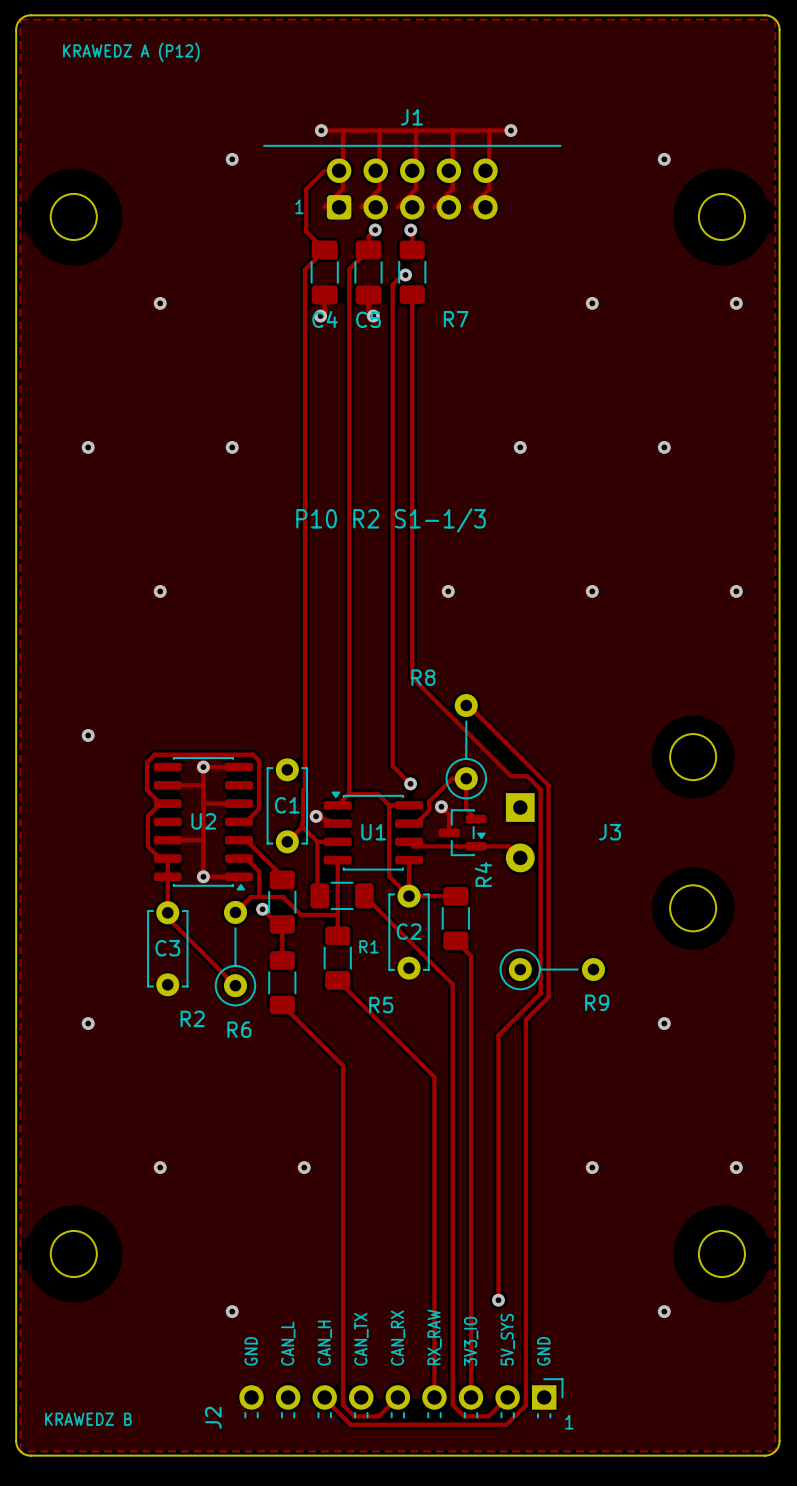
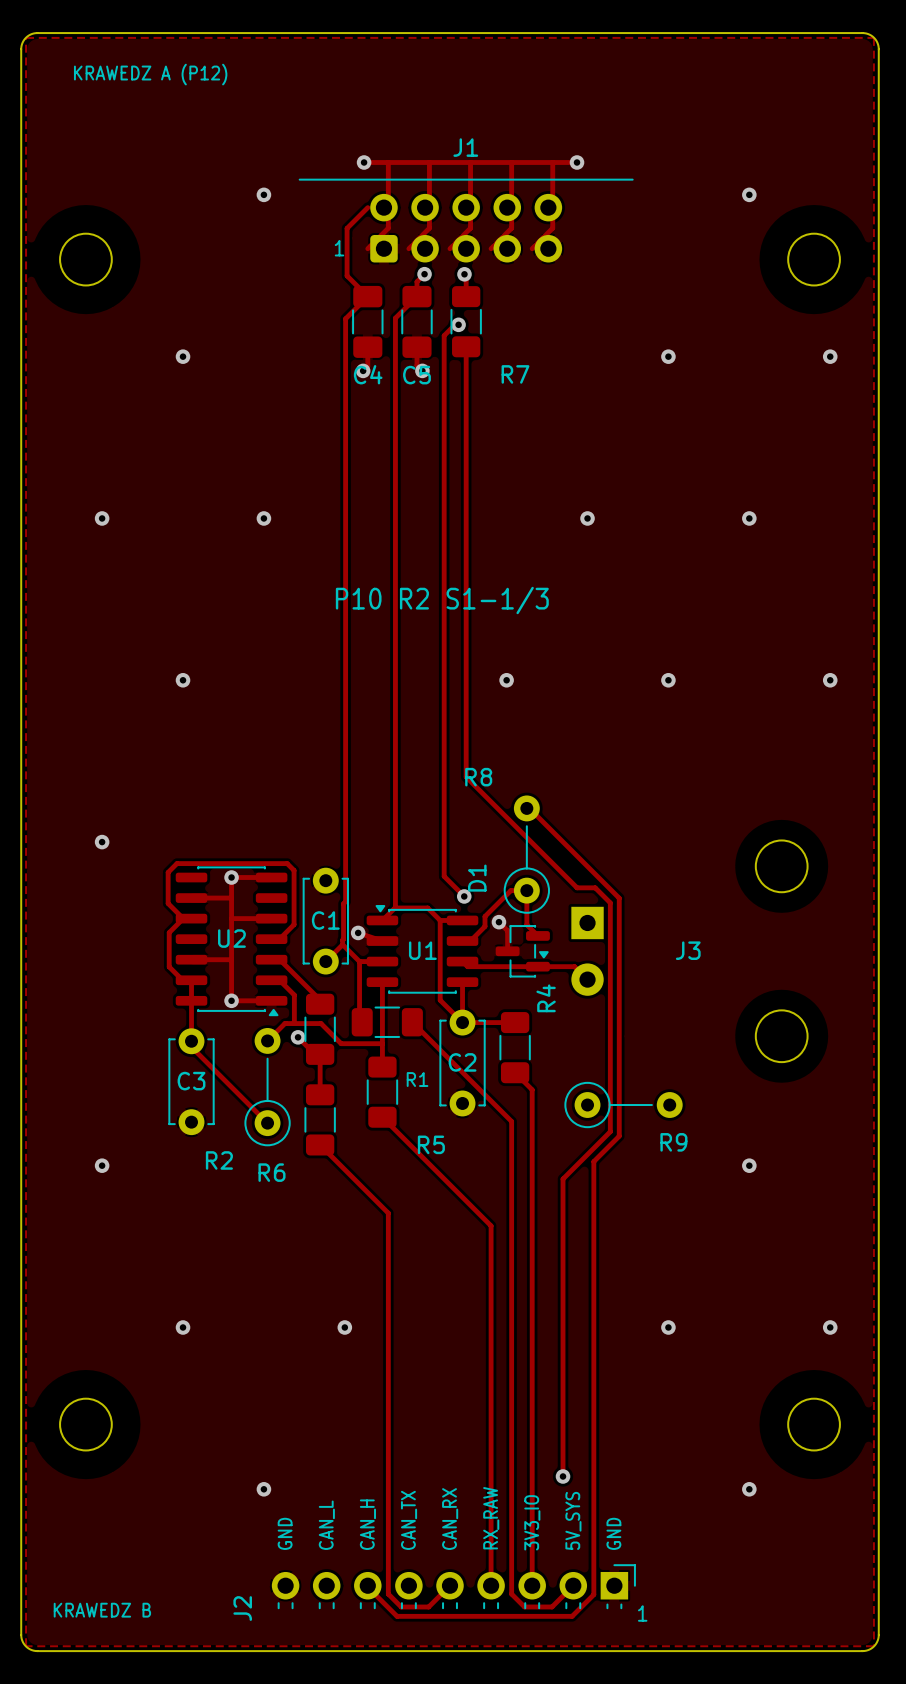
D1 name: none -> D1 (477, 878)

